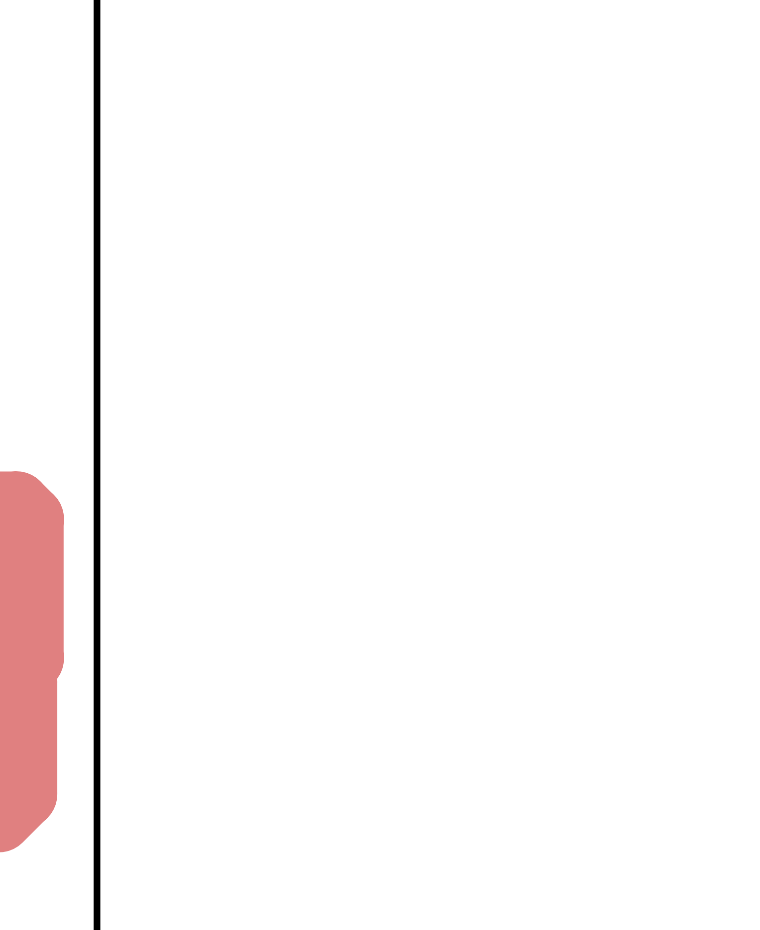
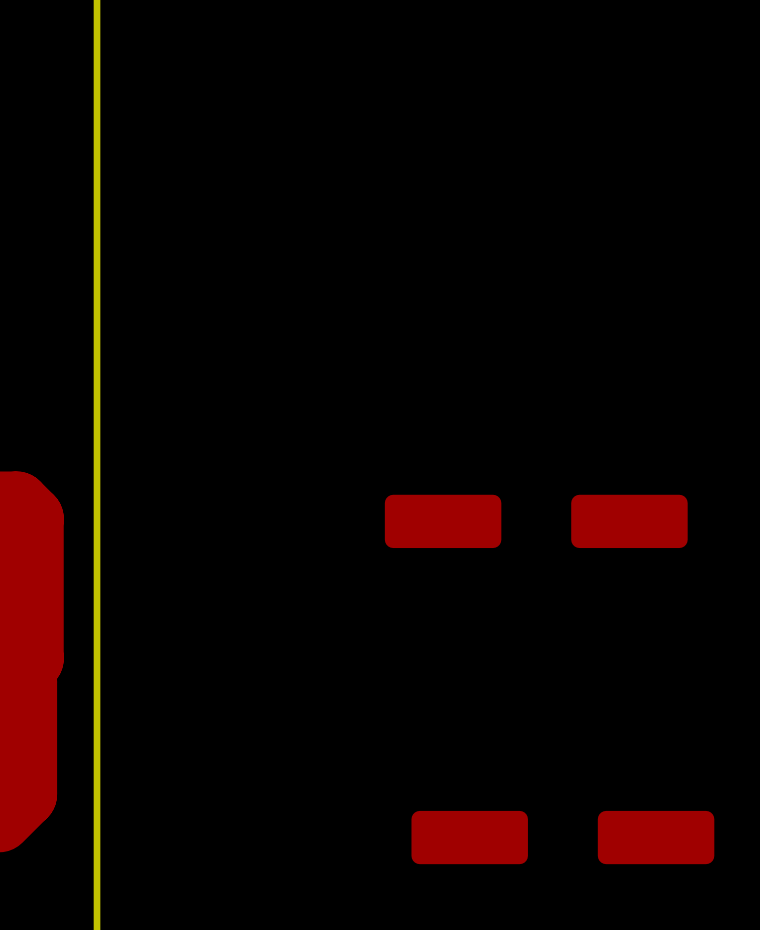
part: none -> (536, 521)
part: none -> (562, 837)

